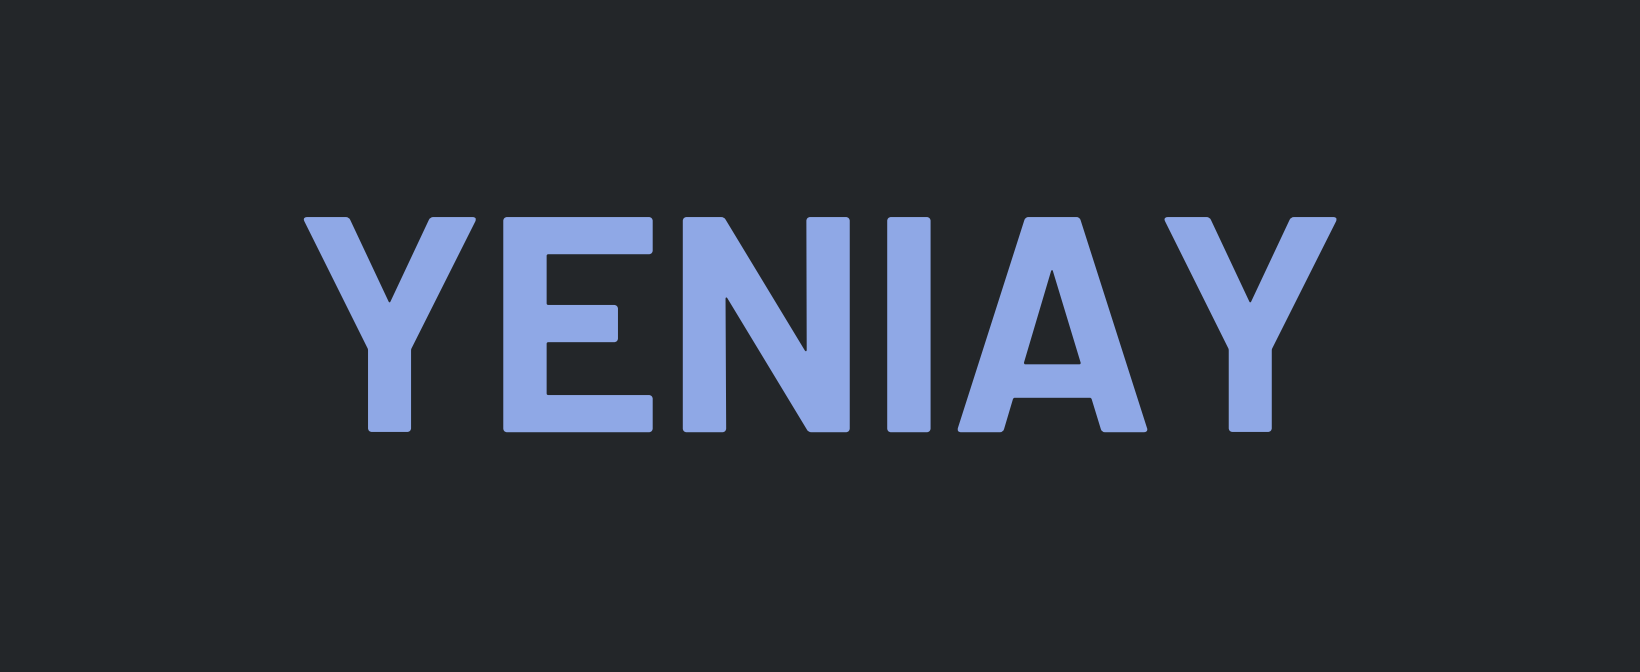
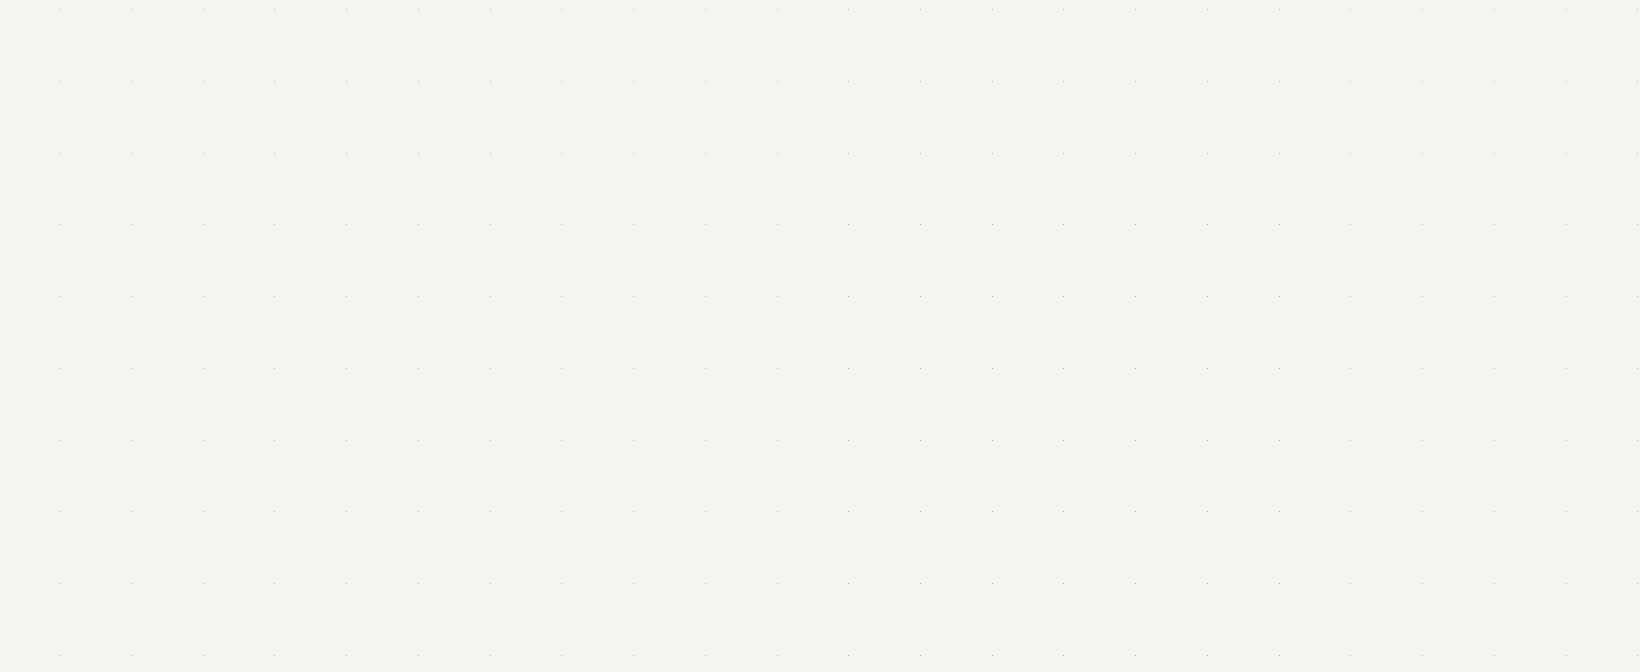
text: YENIAY (820, 324) -> none

